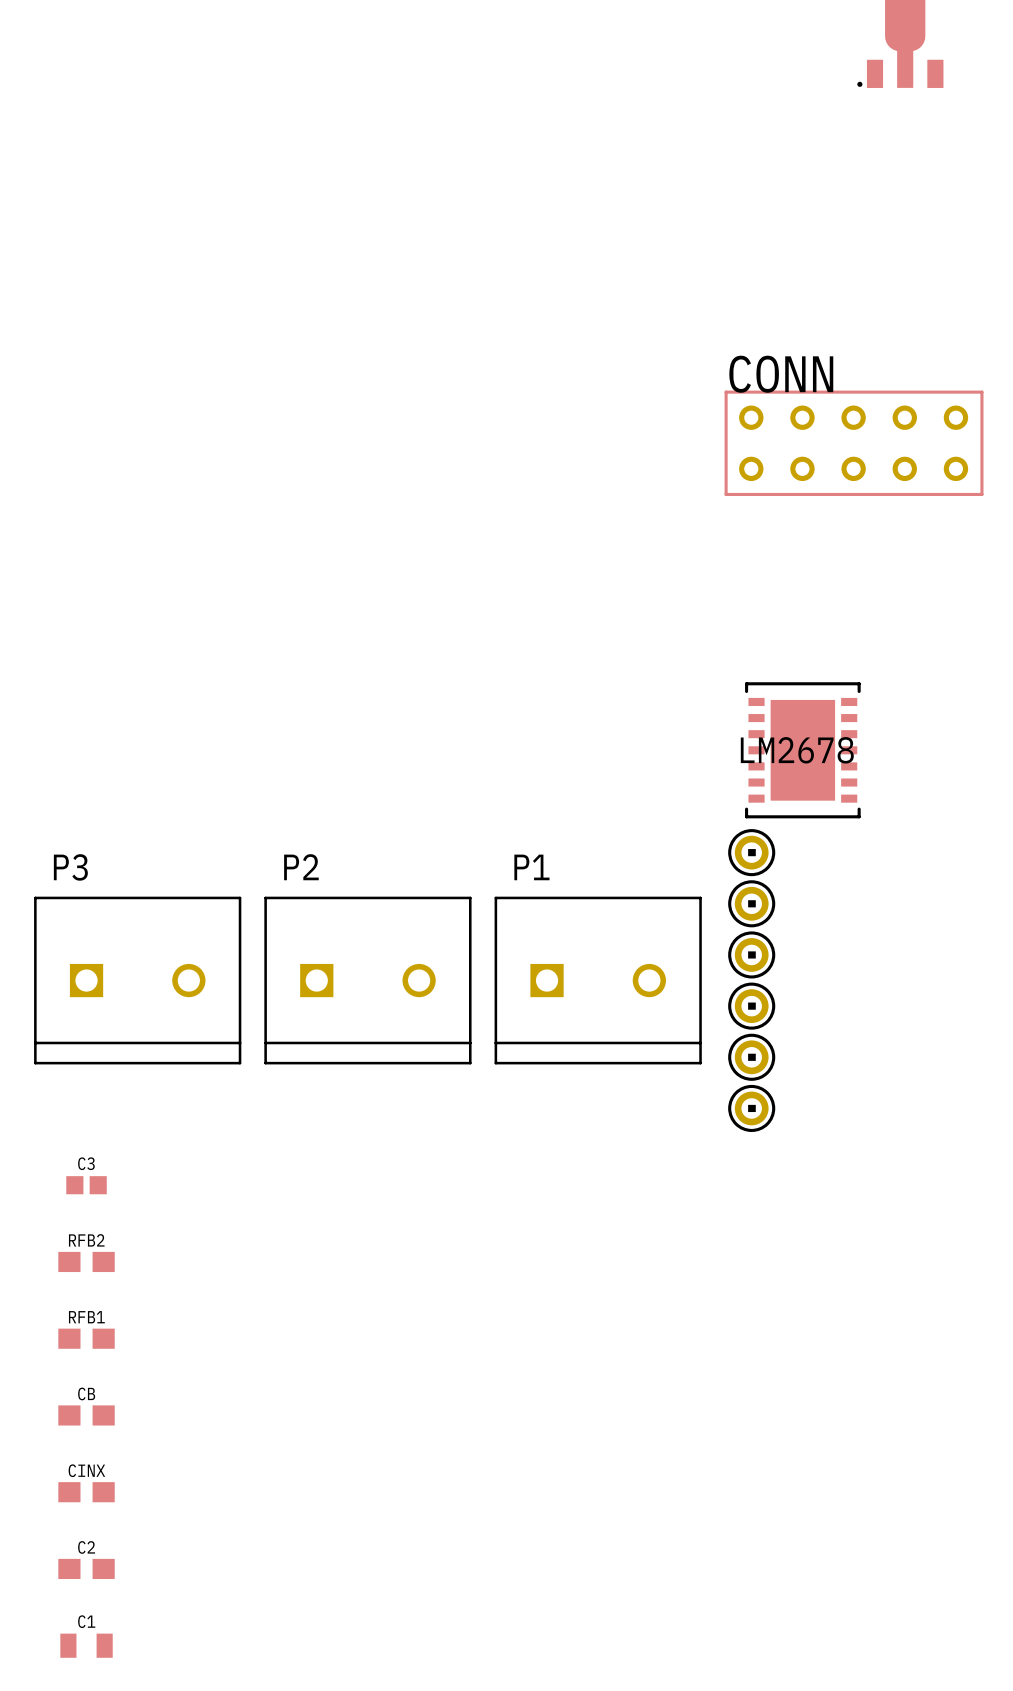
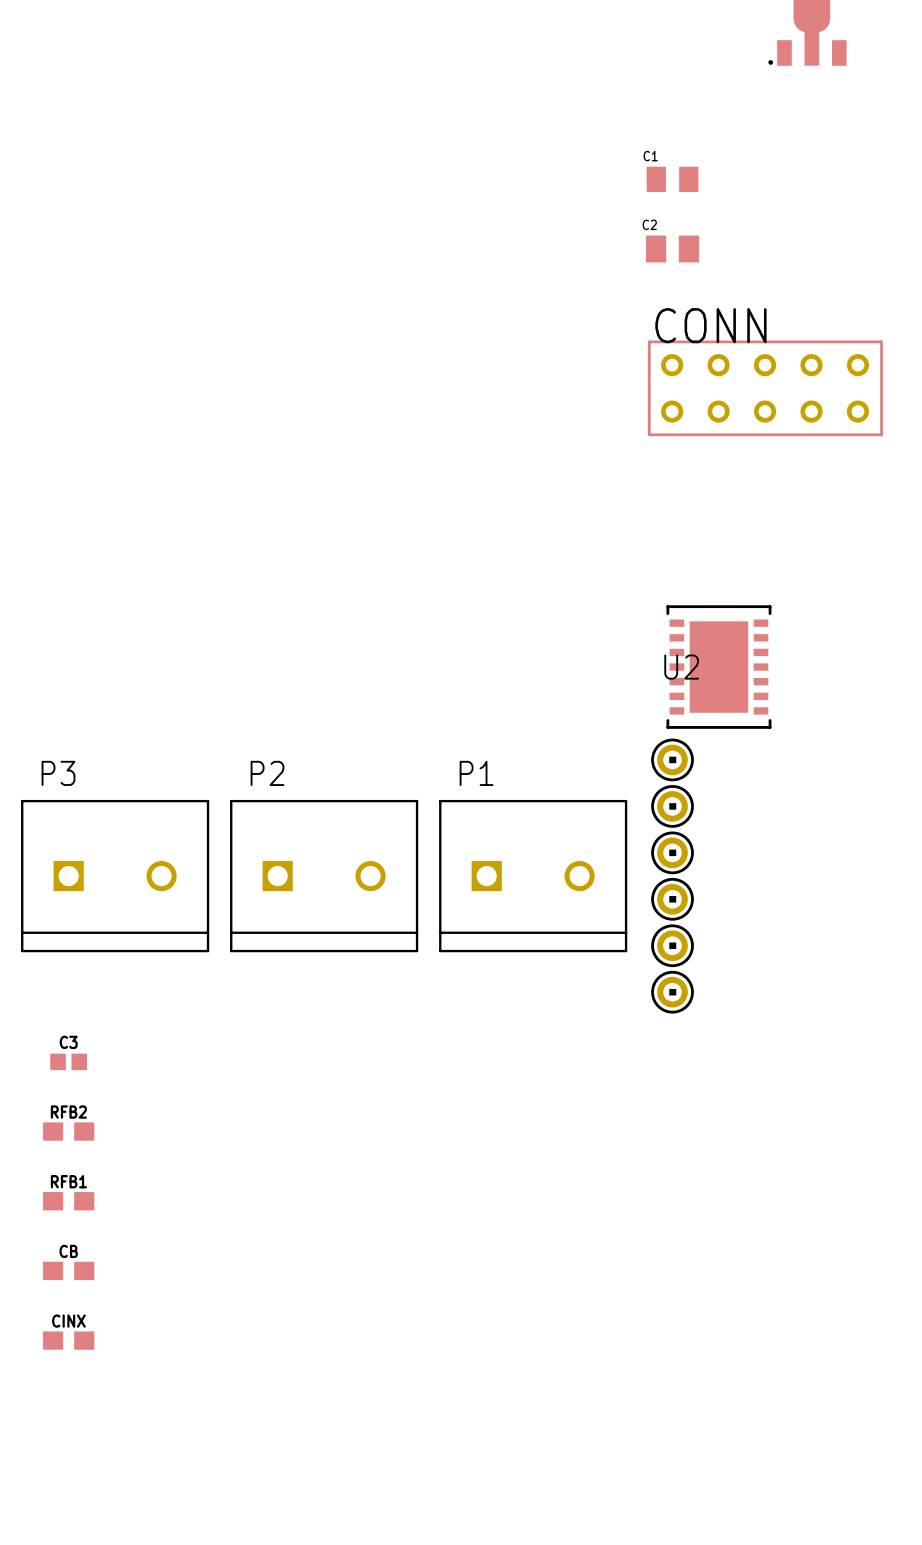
LM2678 name: LM2678 (797, 750) -> U2 (681, 667)
C2 footprint: [58, 1558, 115, 1580] -> [645, 235, 700, 263]
C1 footprint: [60, 1633, 113, 1658] -> [646, 166, 699, 192]

